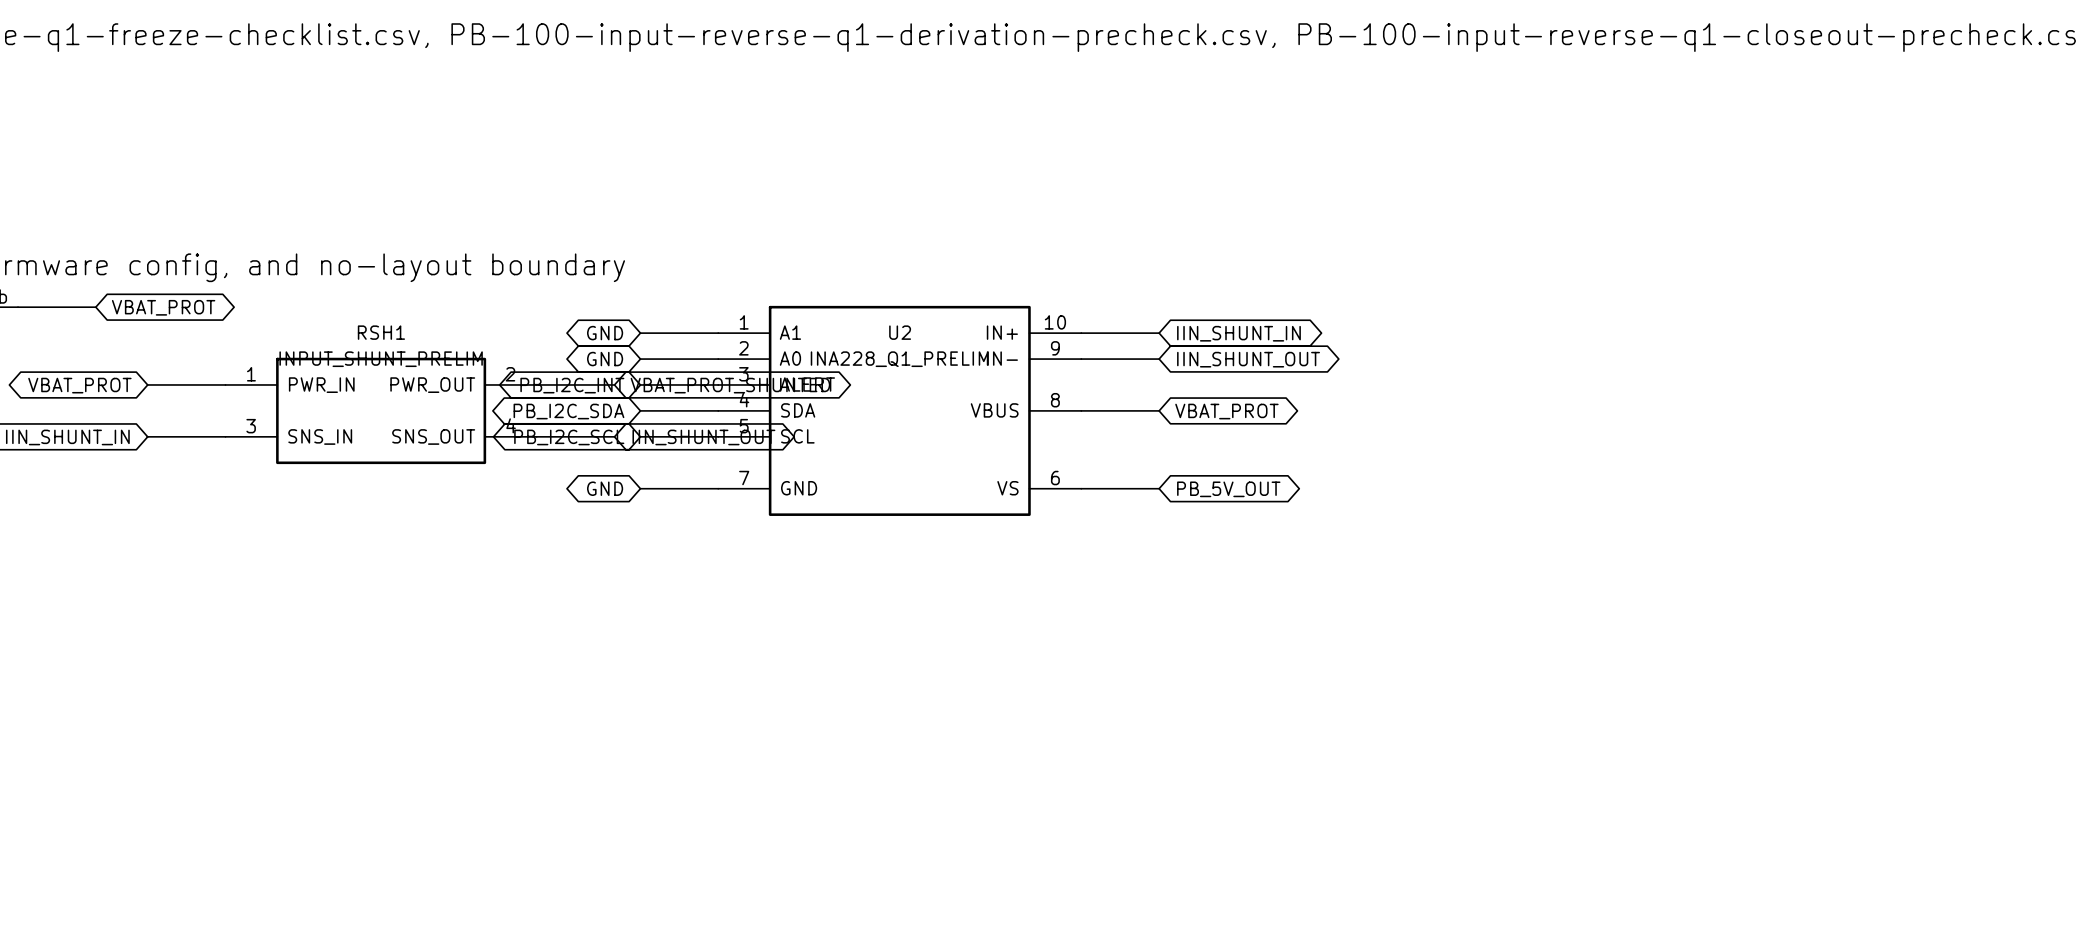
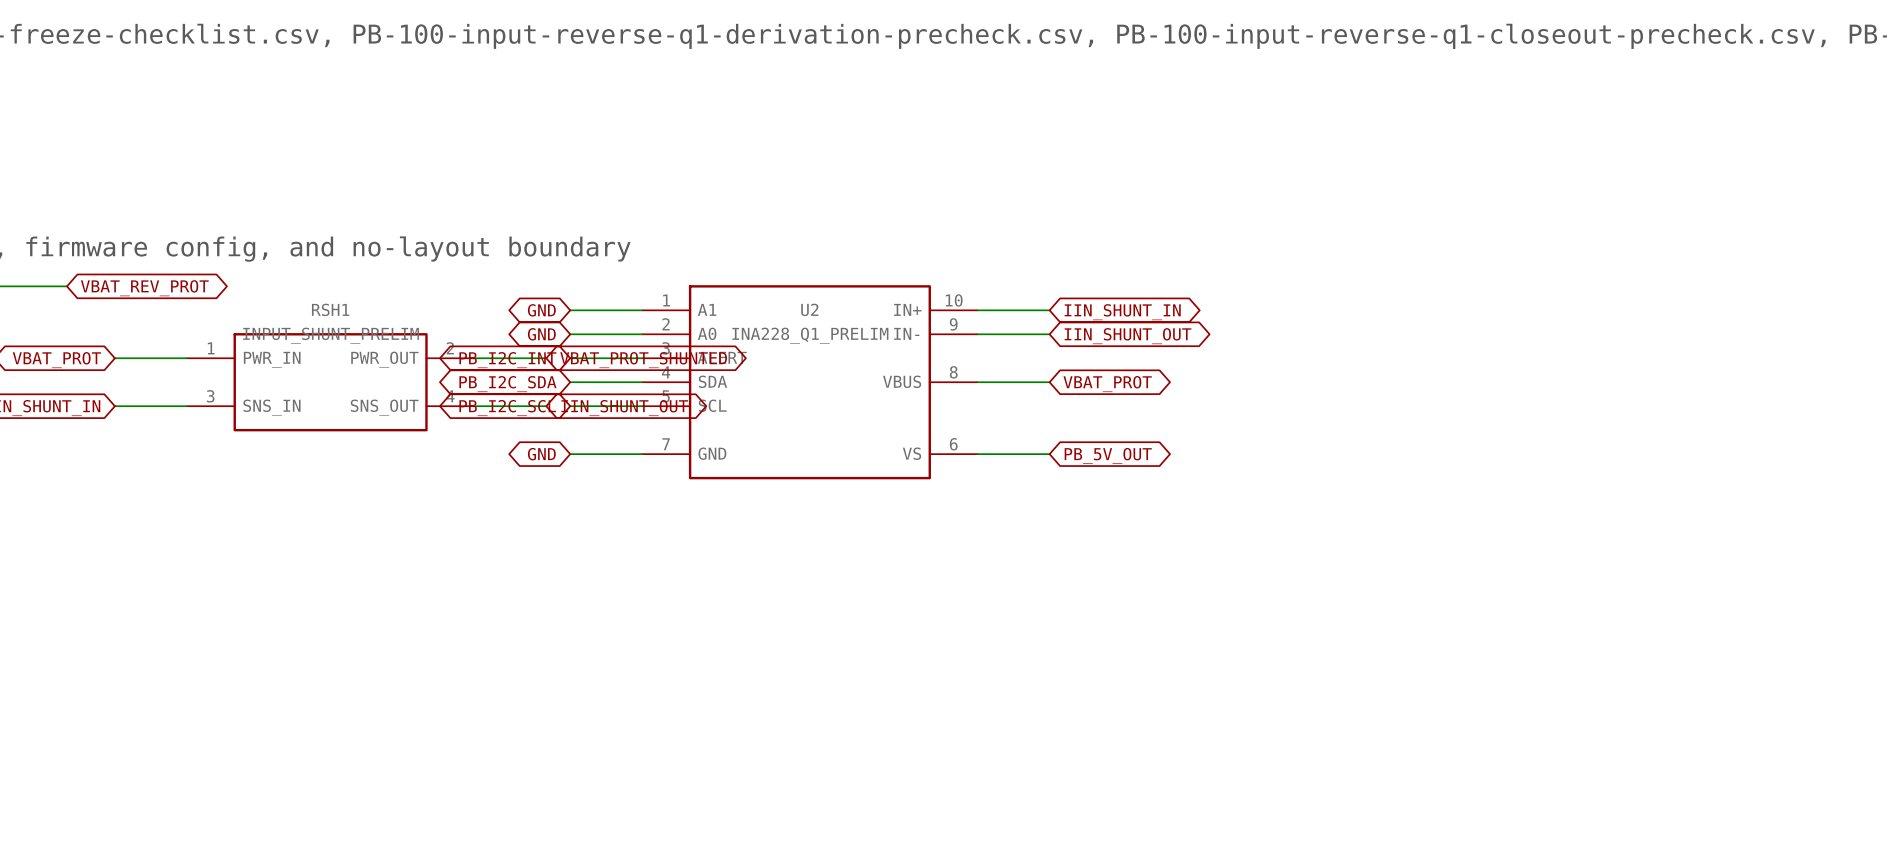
global label: VBAT_PROT (163, 307) -> VBAT_REV_PROT (144, 288)

